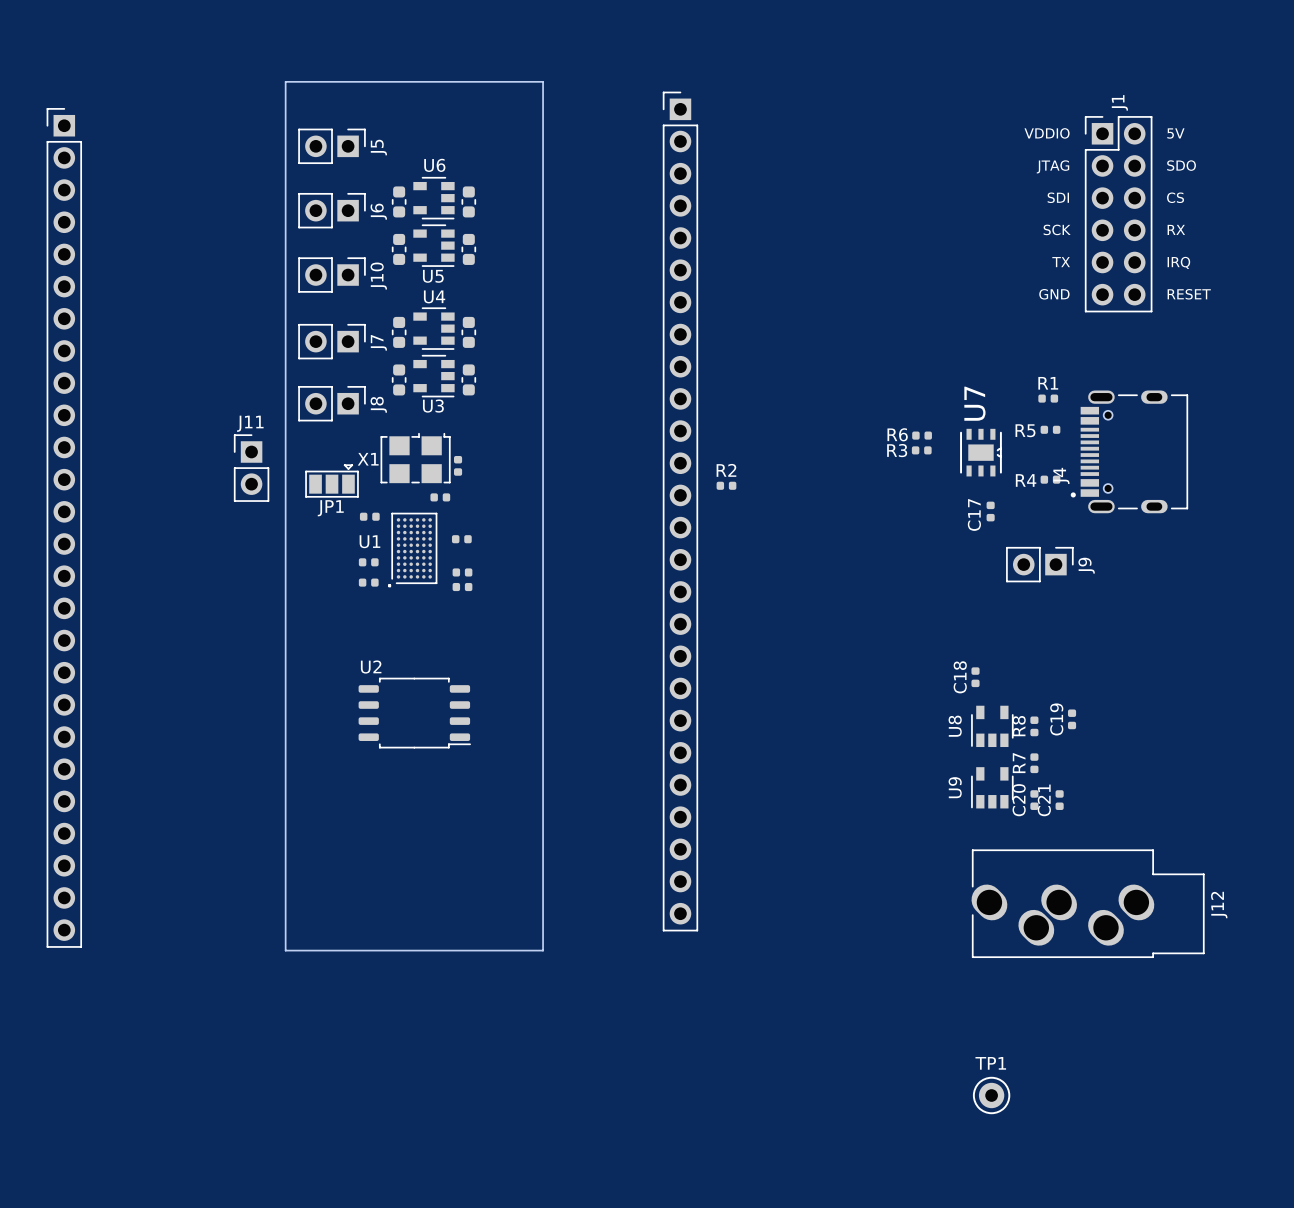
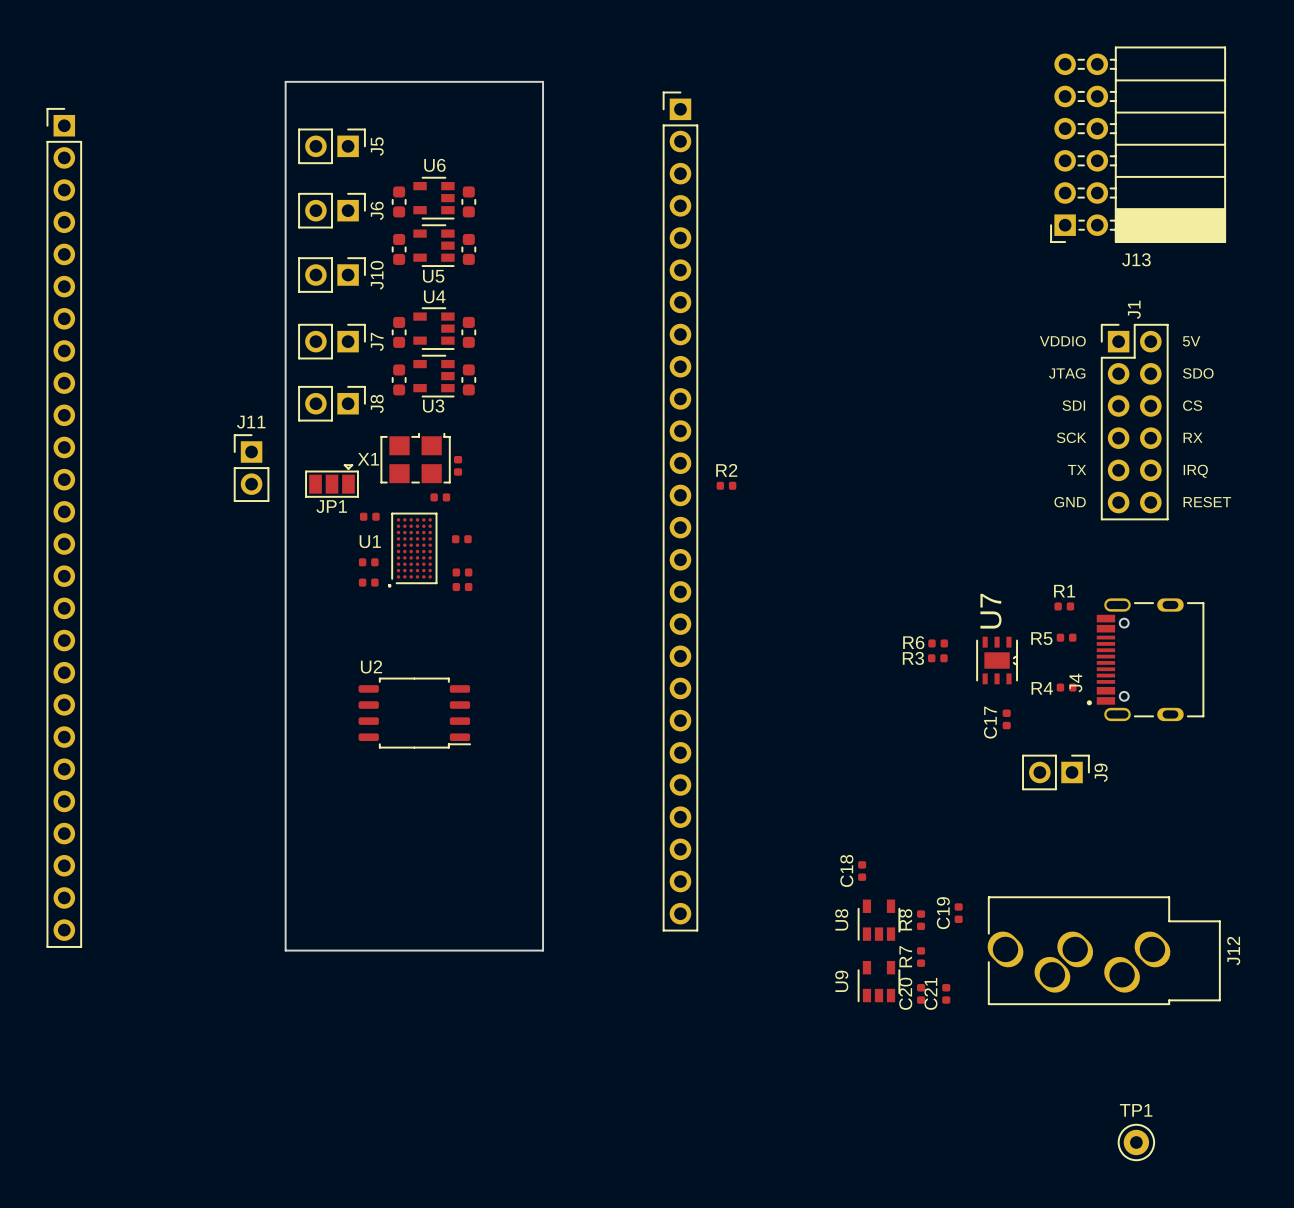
text position: VDDIO (1047, 133) -> VDDIO (1062, 341)
text position: 5V (1175, 133) -> 5V (1191, 341)
J13: none -> (1138, 144)
text position: SDO (1181, 165) -> SDO (1198, 373)
text position: JTAG (1053, 166) -> JTAG (1067, 373)
text position: SDI (1058, 197) -> SDI (1073, 405)
text position: CS (1175, 197) -> CS (1192, 405)
J1 position: (1118, 214) -> (1134, 422)
text position: SCK (1057, 229) -> SCK (1071, 437)
text position: RX (1176, 229) -> RX (1193, 437)
text position: TX (1061, 262) -> TX (1077, 469)
text position: IRQ (1178, 262) -> IRQ (1195, 471)
text position: GND (1054, 294) -> GND (1070, 502)
text position: RESET (1189, 294) -> RESET (1207, 502)
R1 position: (1048, 398) -> (1064, 606)
R5 position: (1050, 429) -> (1066, 637)
R6 position: (922, 435) -> (938, 643)
R3 position: (921, 450) -> (937, 658)
J4 position: (1129, 451) -> (1145, 659)
U7 position: (980, 452) -> (997, 660)
R4 position: (1050, 479) -> (1066, 687)
C17 position: (990, 511) -> (1006, 719)
J9 position: (1039, 564) -> (1055, 772)
C18 position: (975, 677) -> (862, 871)
C19 position: (1072, 719) -> (958, 913)
U8 position: (992, 726) -> (878, 920)
R8 position: (1034, 726) -> (921, 920)
R7 position: (1034, 763) -> (921, 957)
U9 position: (992, 787) -> (878, 981)
C20 position: (1034, 800) -> (921, 993)
C21 position: (1059, 800) -> (946, 993)
J12 position: (1088, 903) -> (1104, 950)
TP1 position: (991, 1095) -> (1136, 1142)

